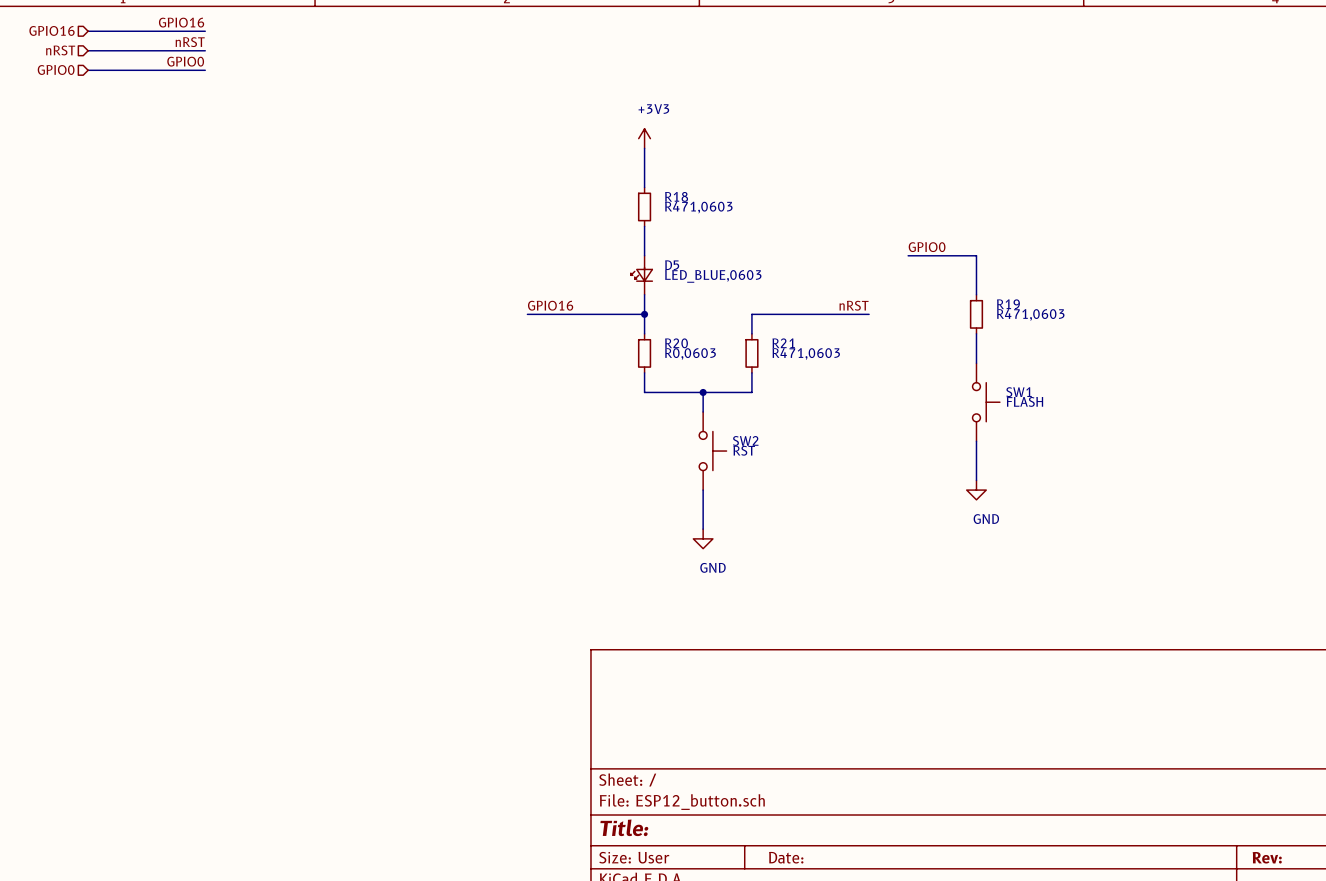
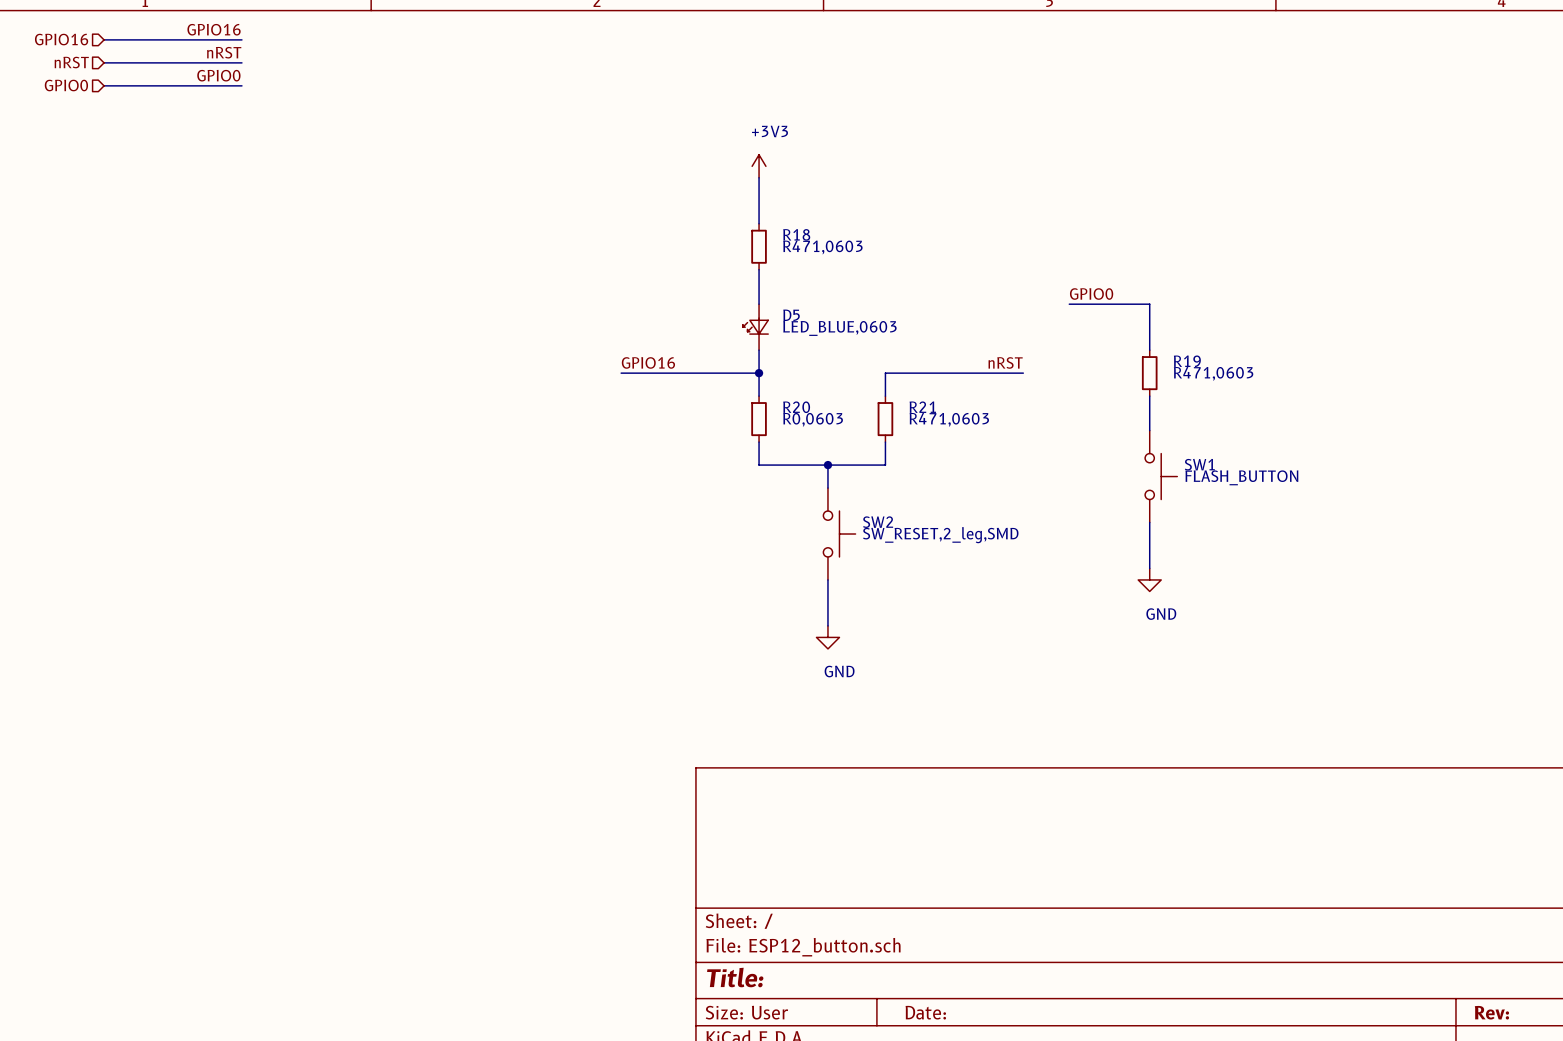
SW1 value: FLASH (1024, 401) -> FLASH_BUTTON (1241, 477)
SW2 value: RST (744, 450) -> SW_RESET,2_leg,SMD (940, 535)

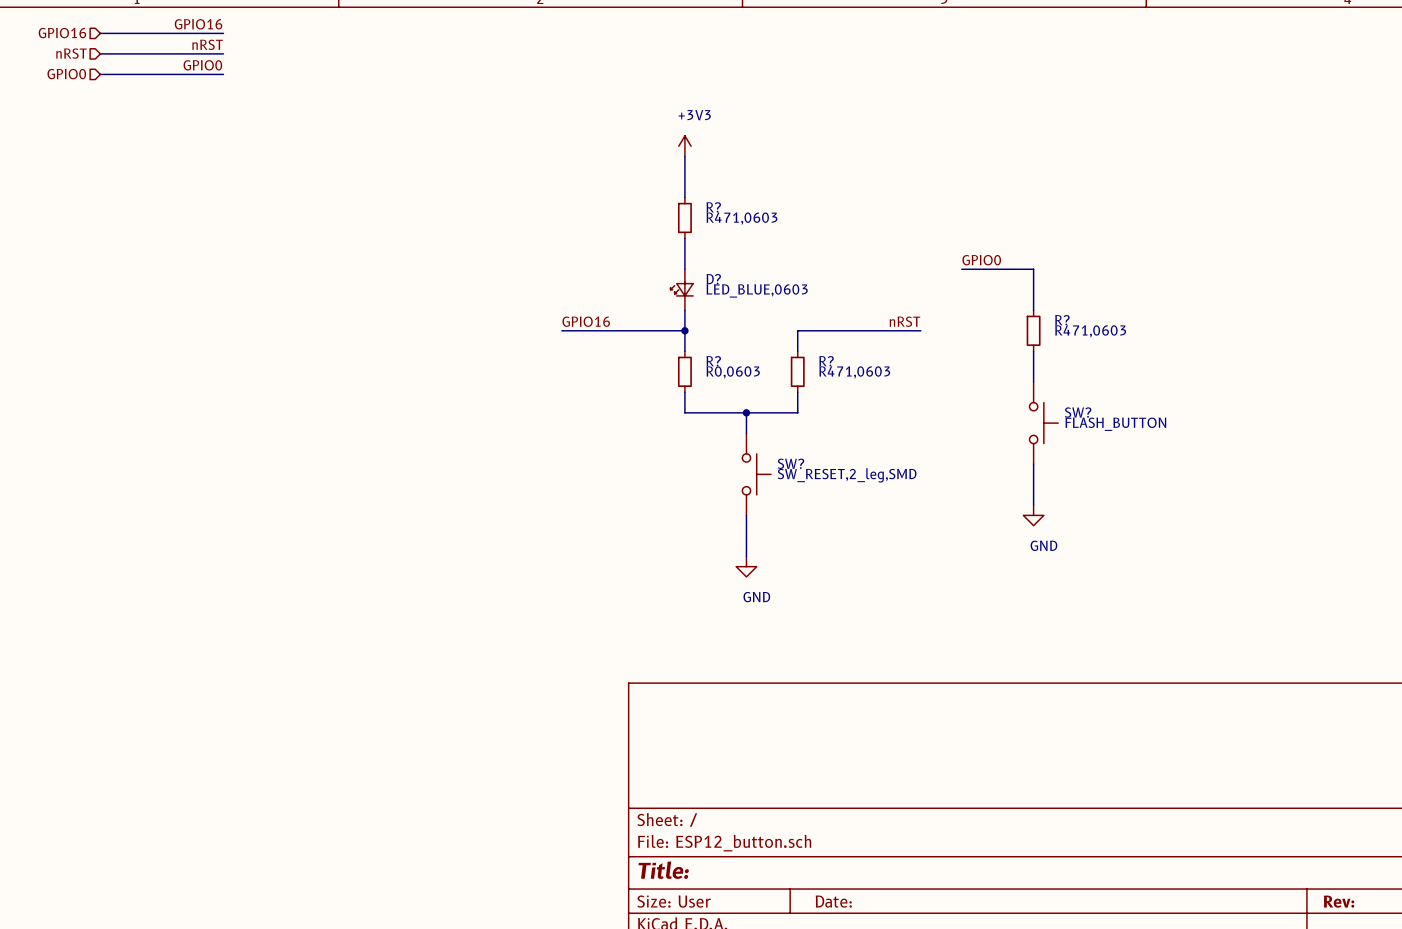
R18 name: R18 (796, 234) -> R? (713, 207)
D5 name: D5 (791, 315) -> D? (713, 279)
R19 name: R19 (1187, 361) -> R? (1062, 320)
R20 name: R20 (796, 407) -> R? (713, 361)
R21 name: R21 (922, 407) -> R? (826, 361)
SW1 name: SW1 (1199, 464) -> SW? (1078, 412)
SW2 name: SW2 (878, 522) -> SW? (790, 463)

